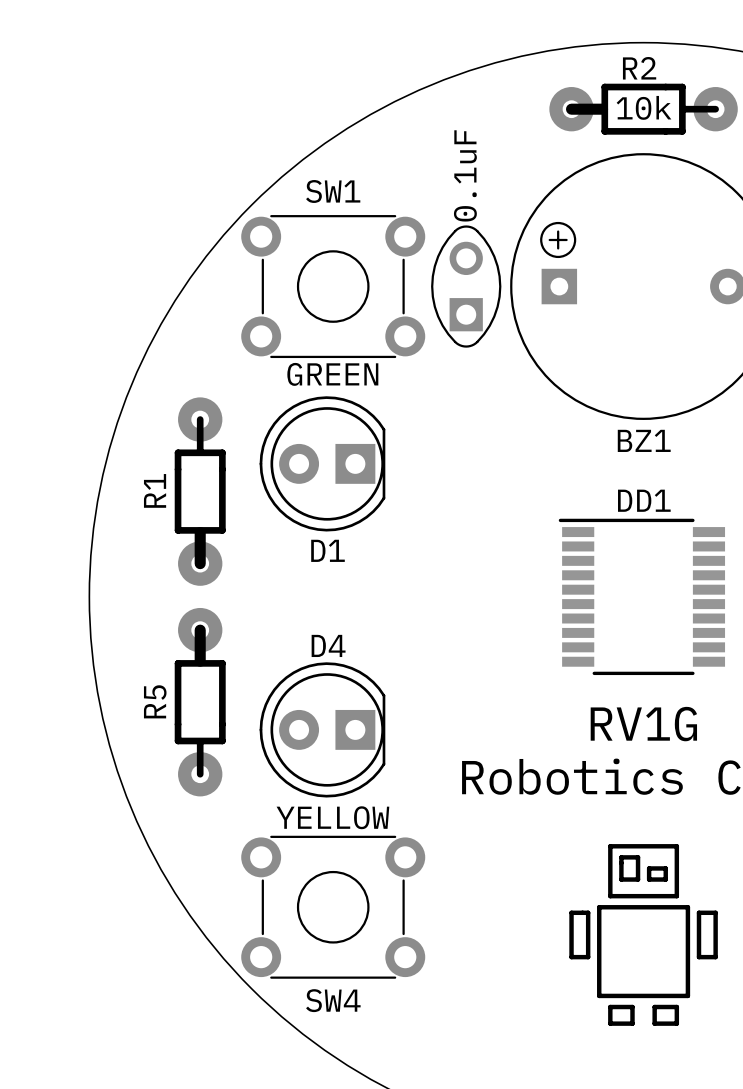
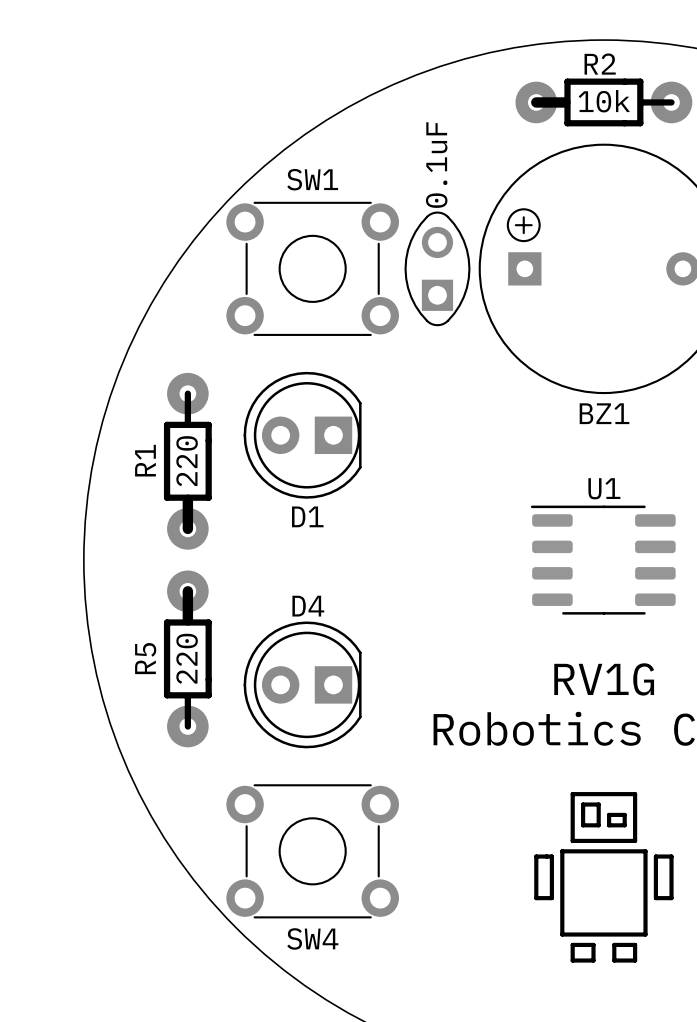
text: GREEN (332, 374) -> none
R1 value: none -> 220 (187, 461)
DD1: (641, 596) -> none
U1: none -> (603, 560)
R5 value: none -> 220 (187, 658)
text: YELLOW (332, 817) -> none

